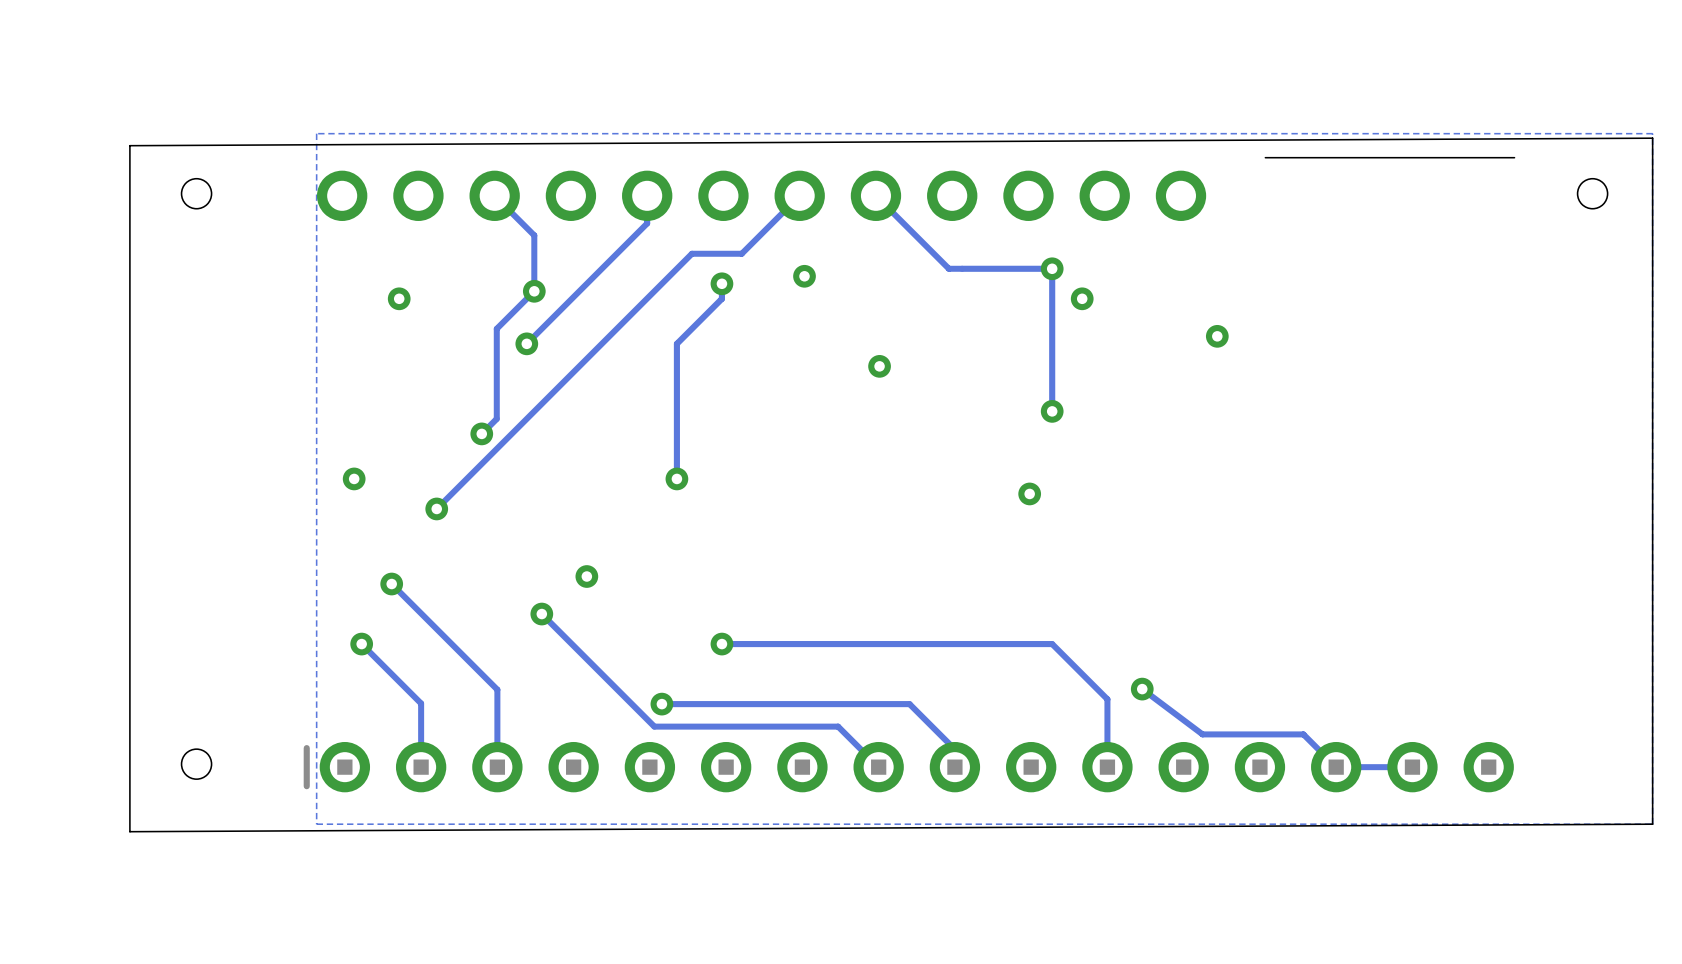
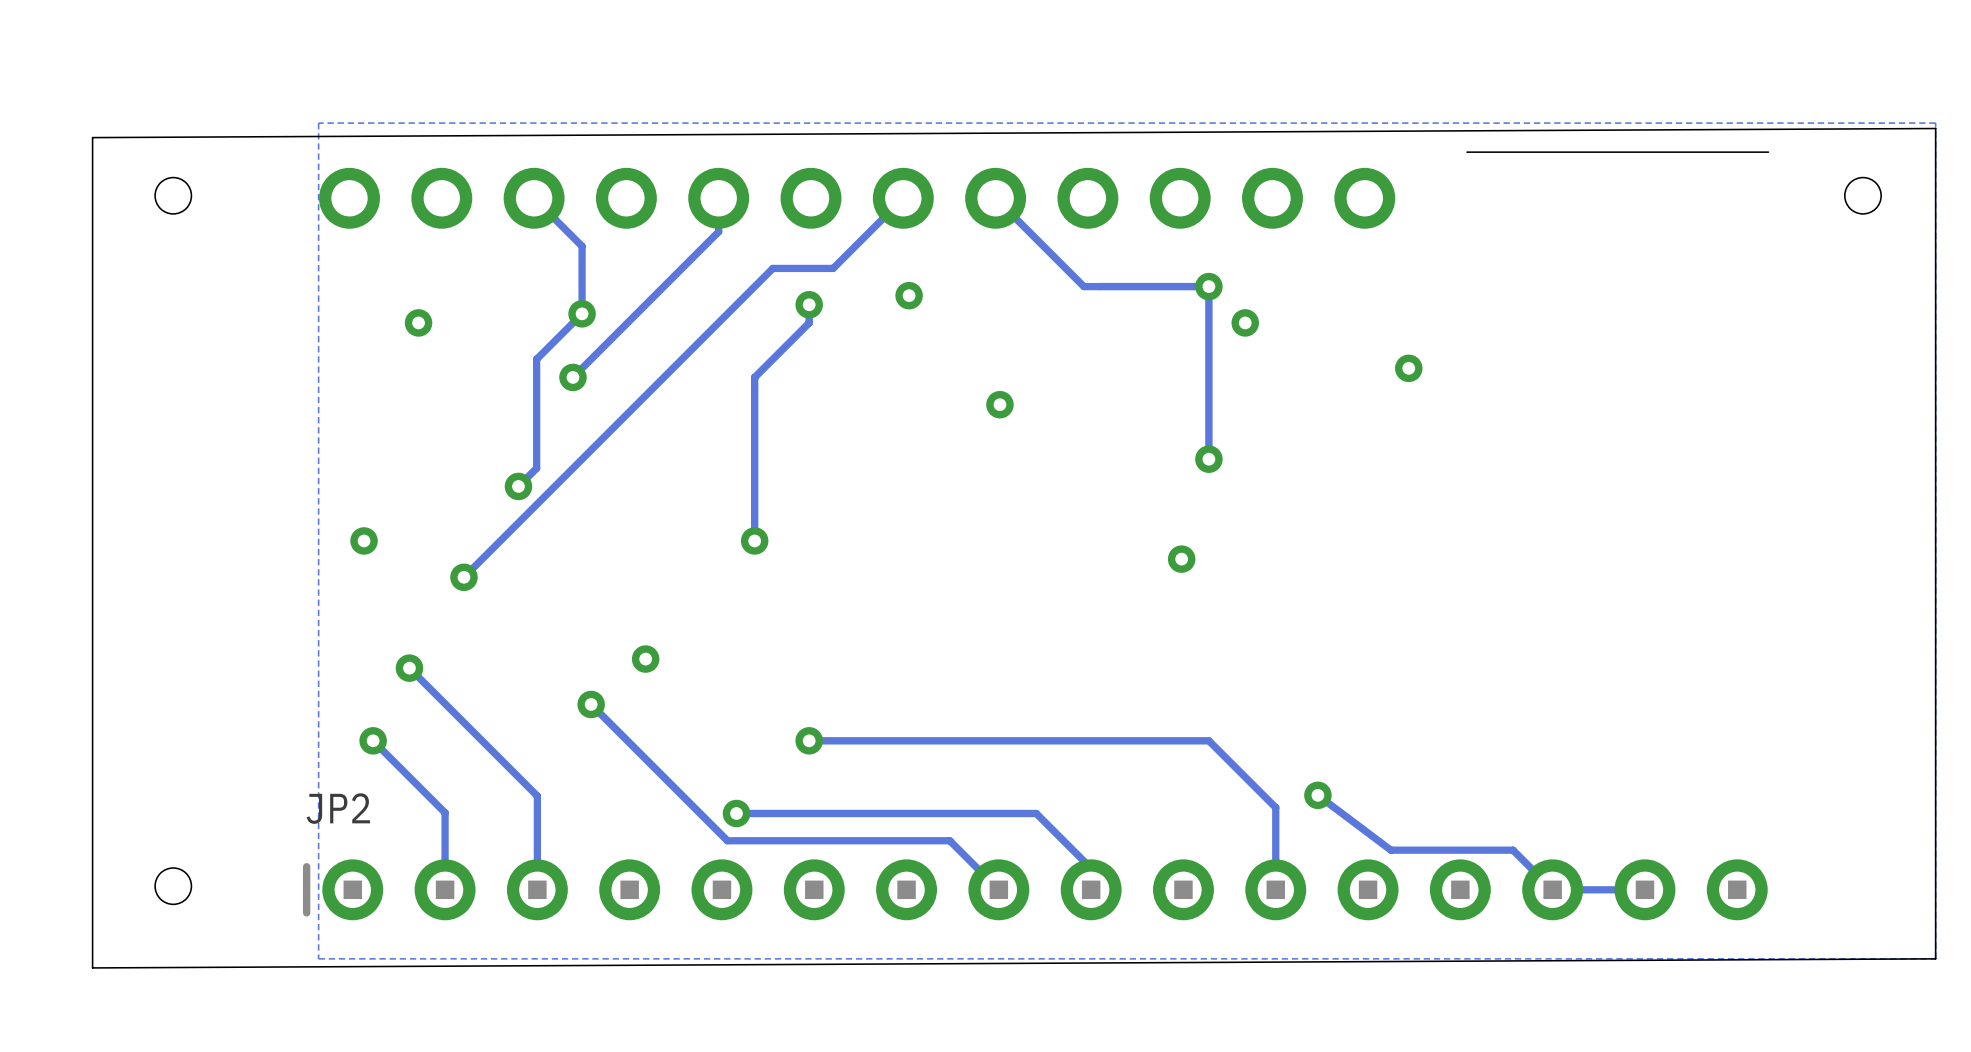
JP2 name: none -> JP2 (338, 808)

